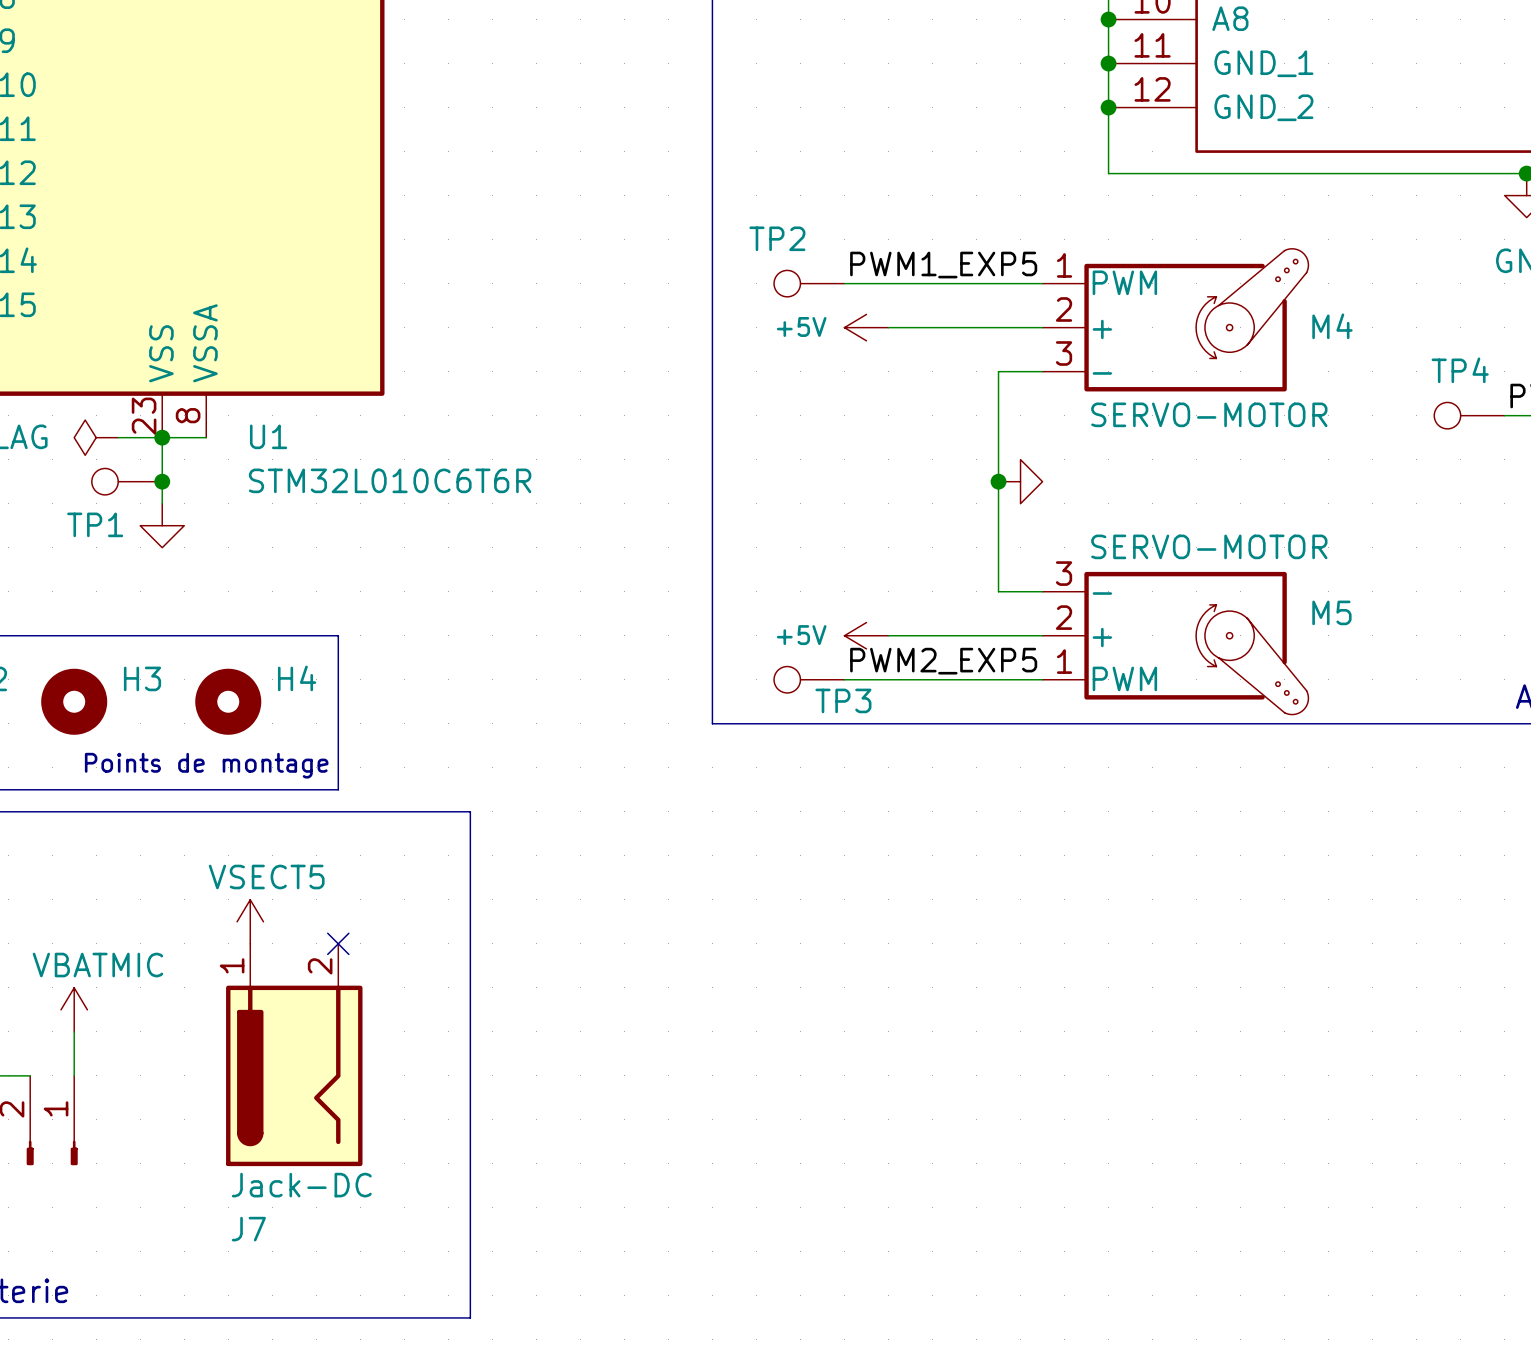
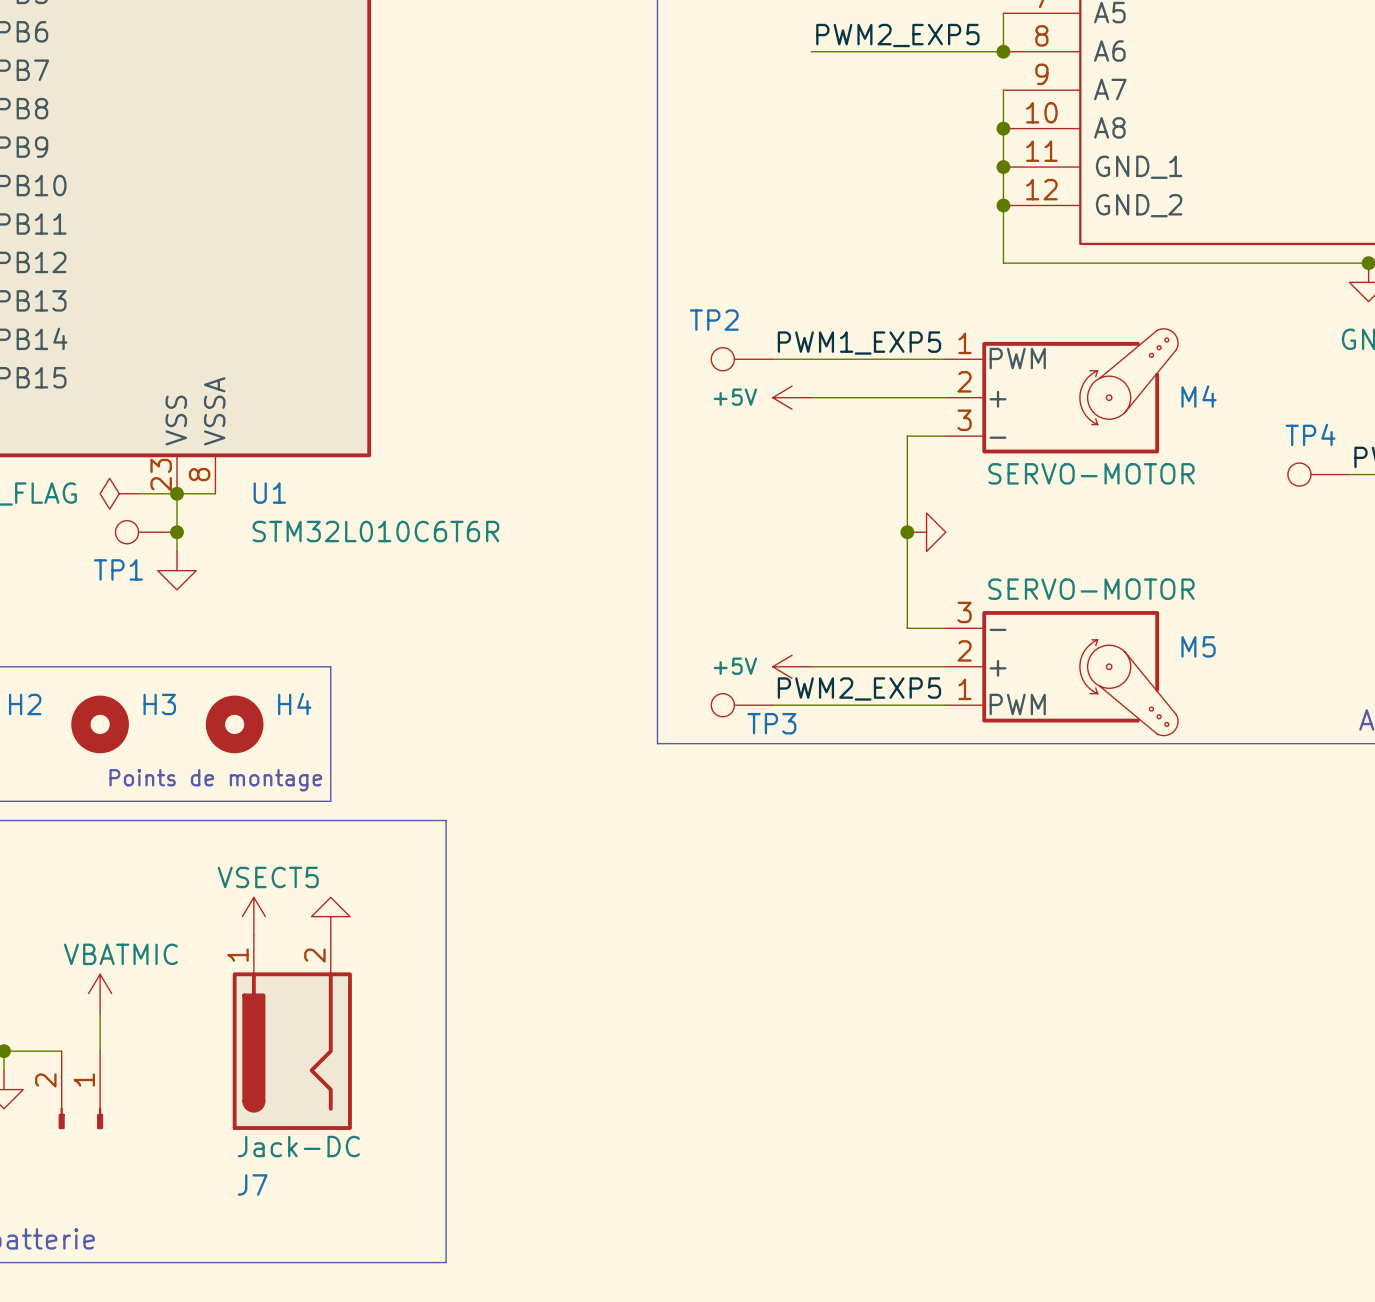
power symbol: none -> (330, 916)
no-connect mark: (338, 943) -> none

